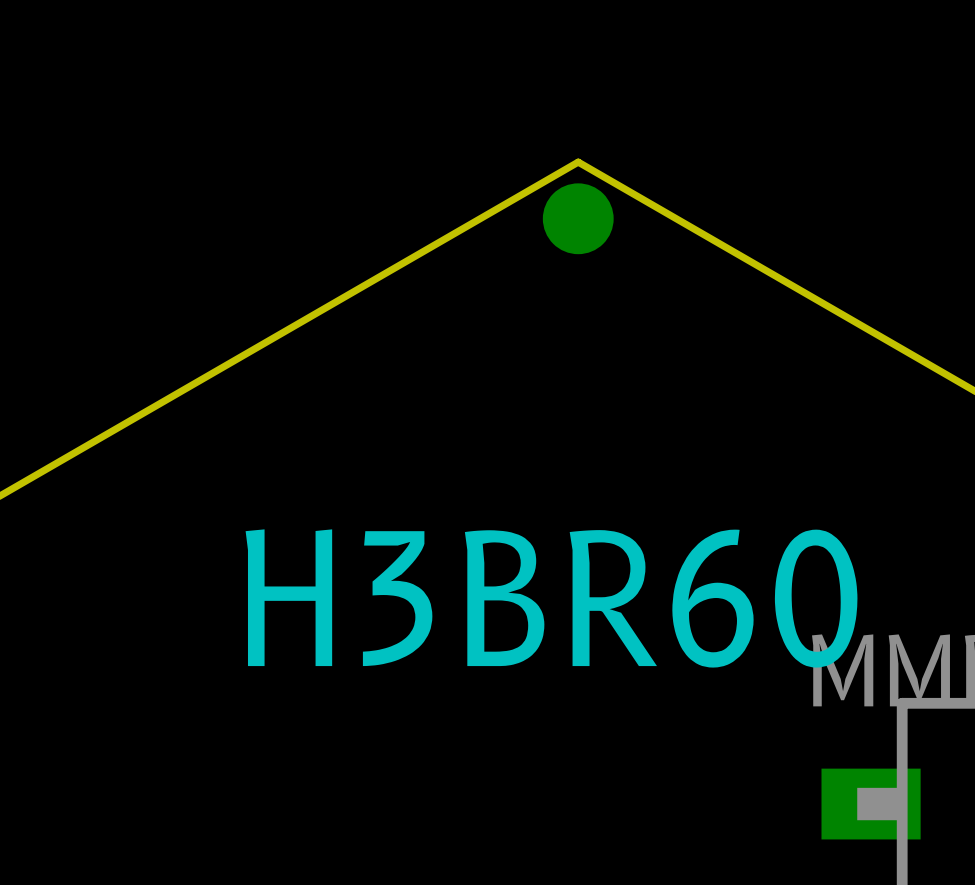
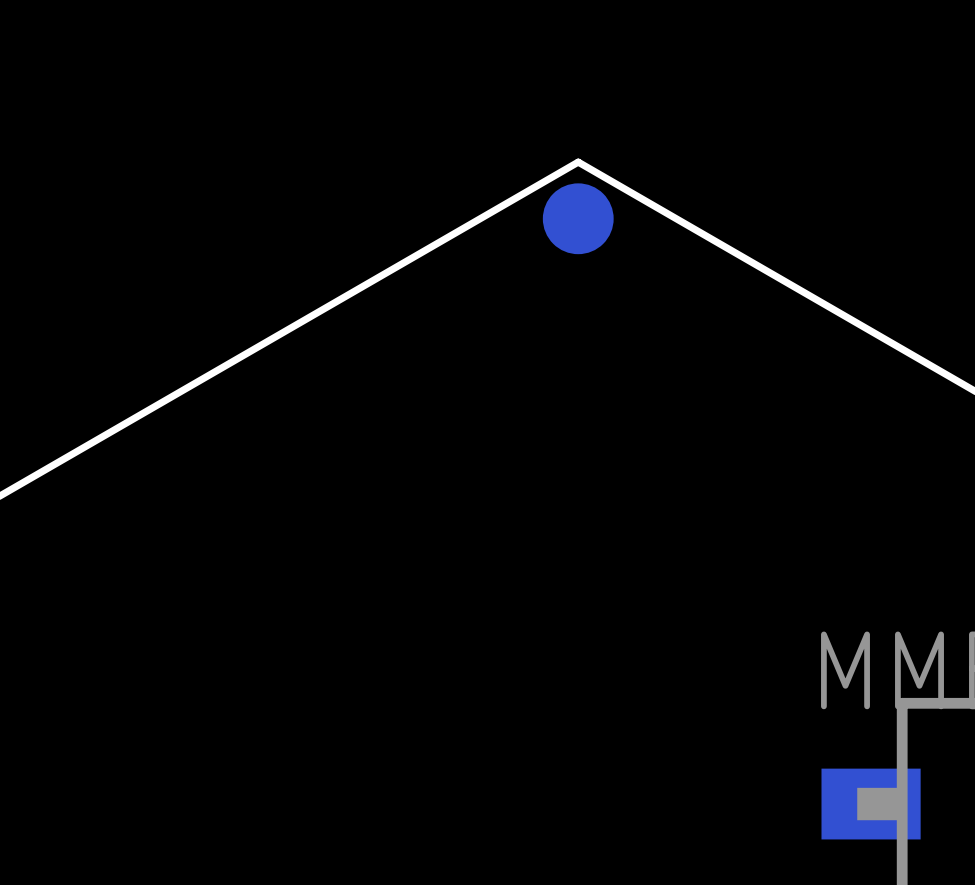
text: H3BR60 (551, 598) -> none

